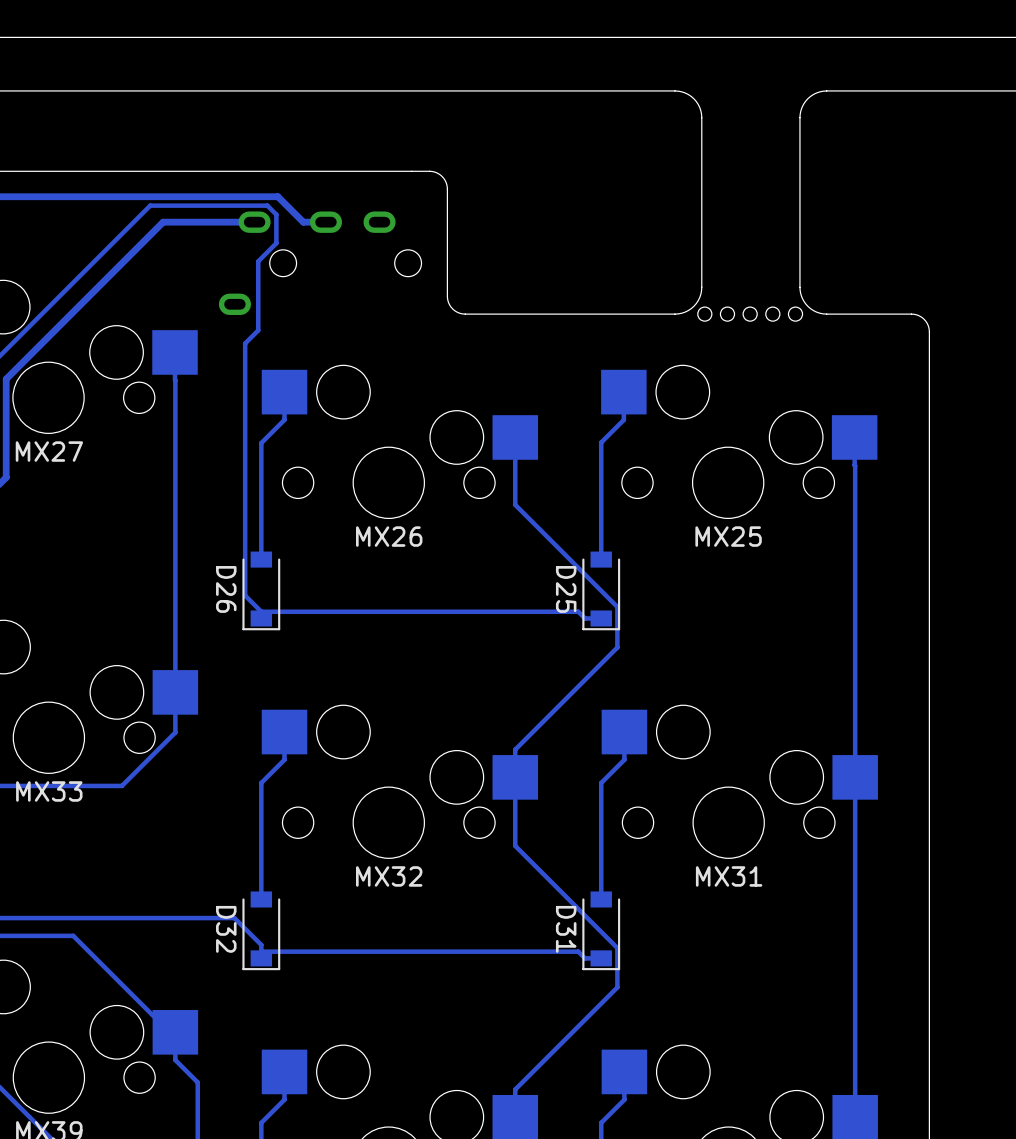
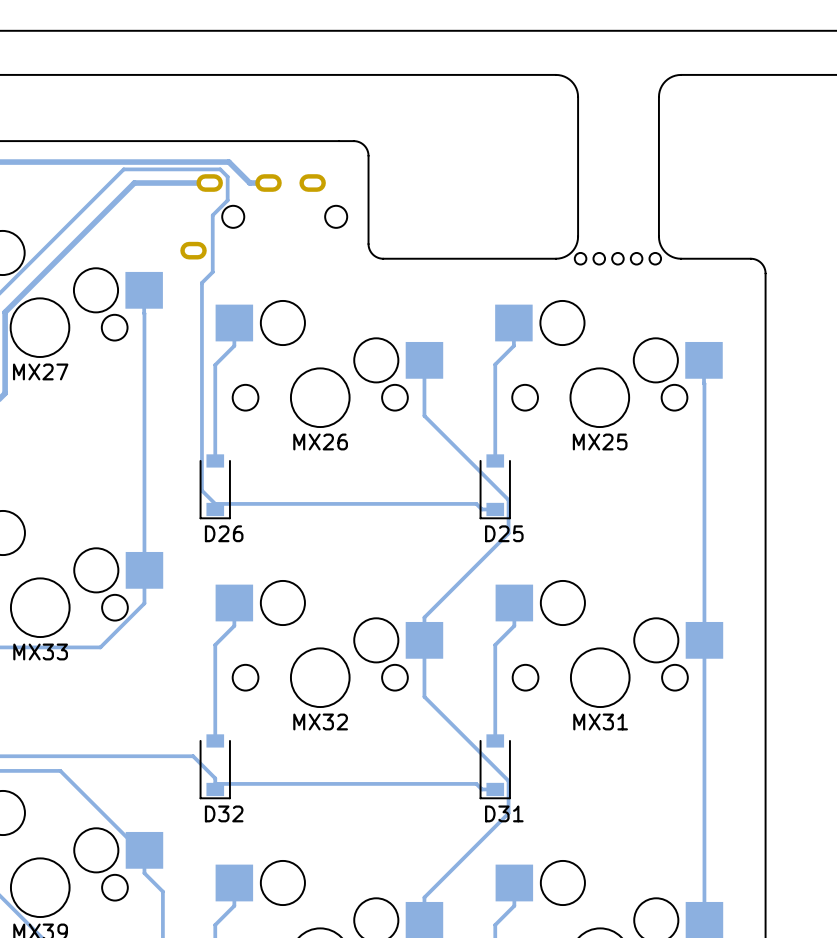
D26 name rotation: 0° (226, 589) -> 90° counterclockwise (224, 533)
D26 name position: D26 (226, 589) -> D26 (224, 533)
D25 name rotation: 0° (566, 589) -> 90° counterclockwise (504, 533)
D25 name position: D25 (566, 589) -> D25 (504, 533)
D32 name rotation: 0° (226, 929) -> 90° counterclockwise (224, 813)
D32 name position: D32 (226, 929) -> D32 (224, 813)
D31 name rotation: 0° (566, 929) -> 90° counterclockwise (504, 813)
D31 name position: D31 (566, 929) -> D31 (504, 813)

